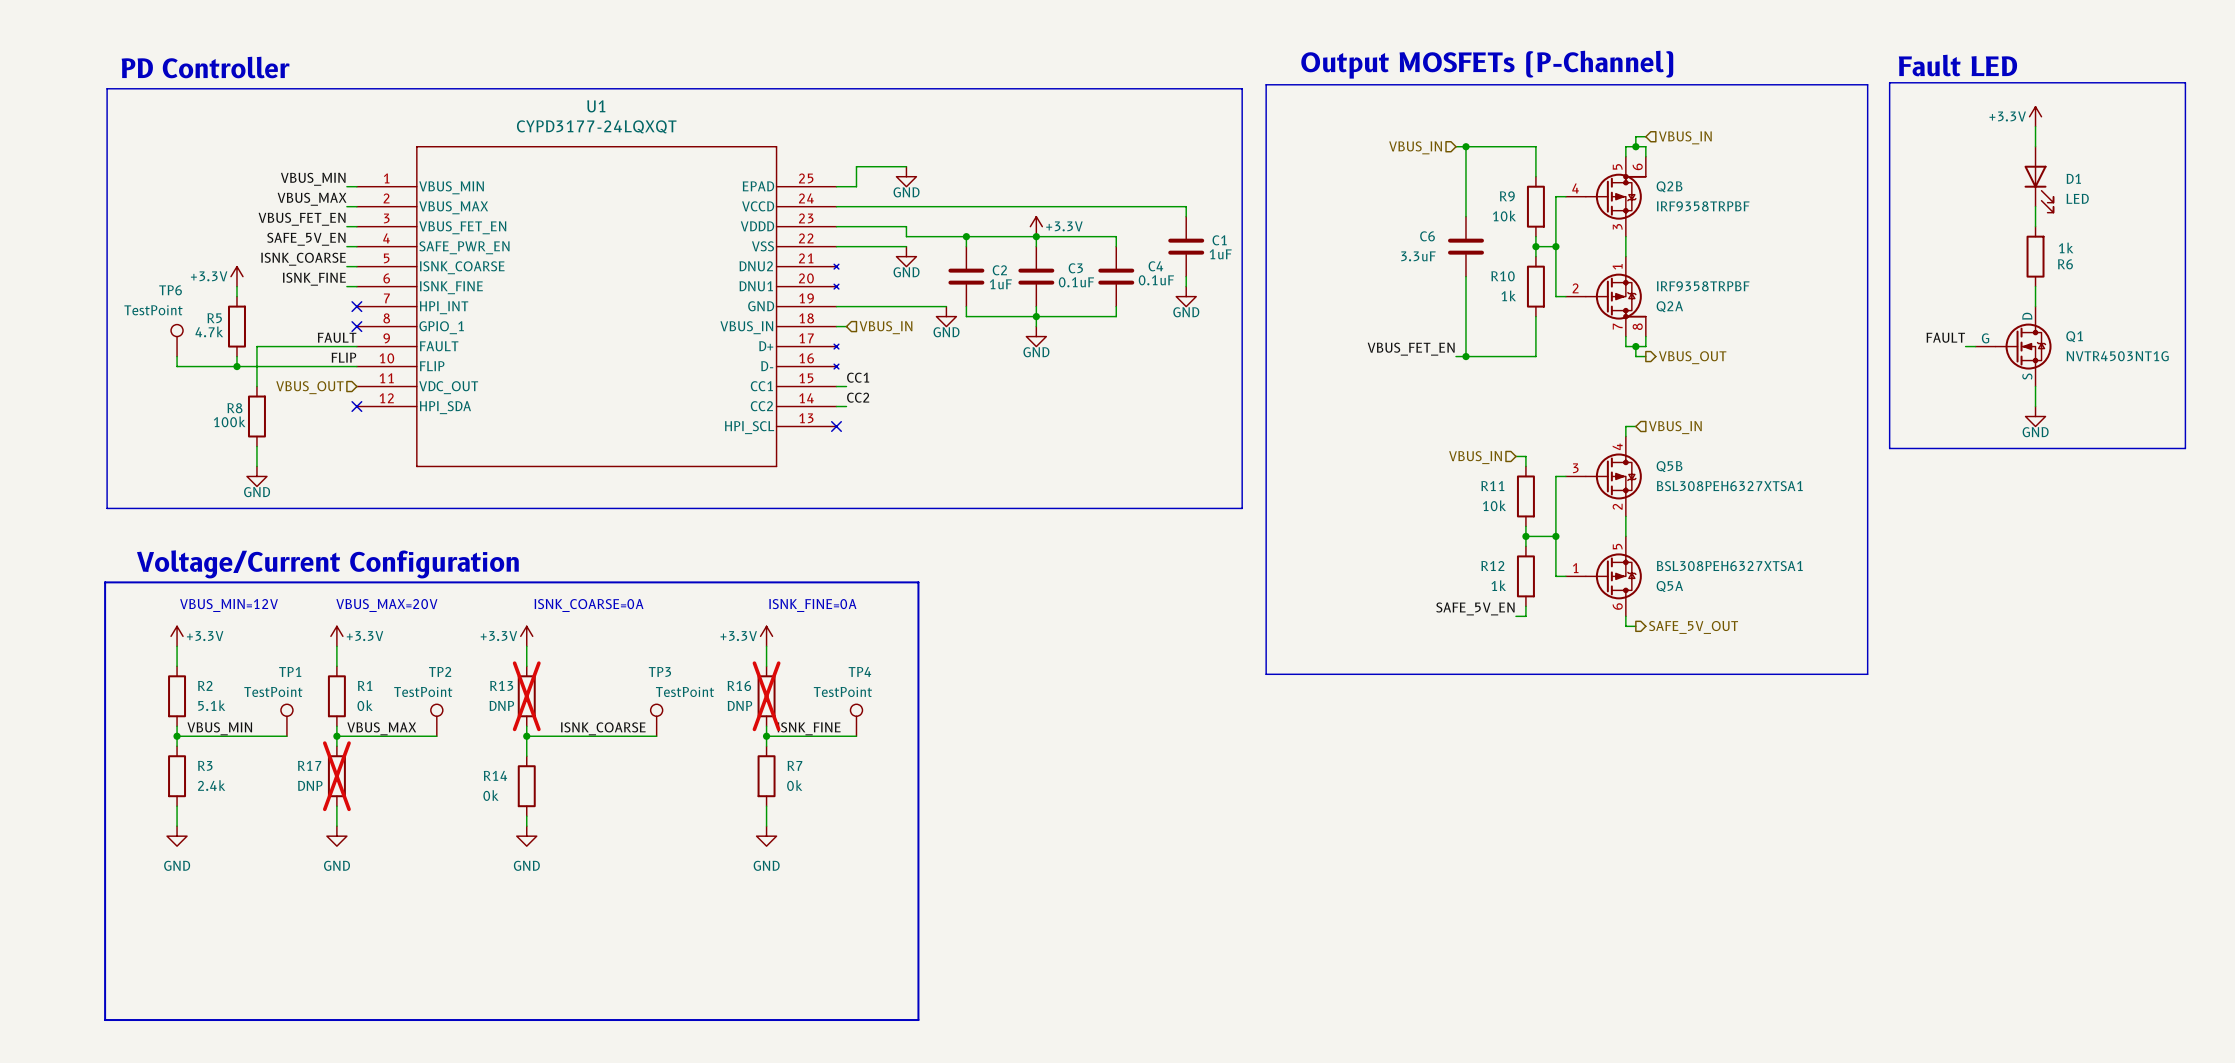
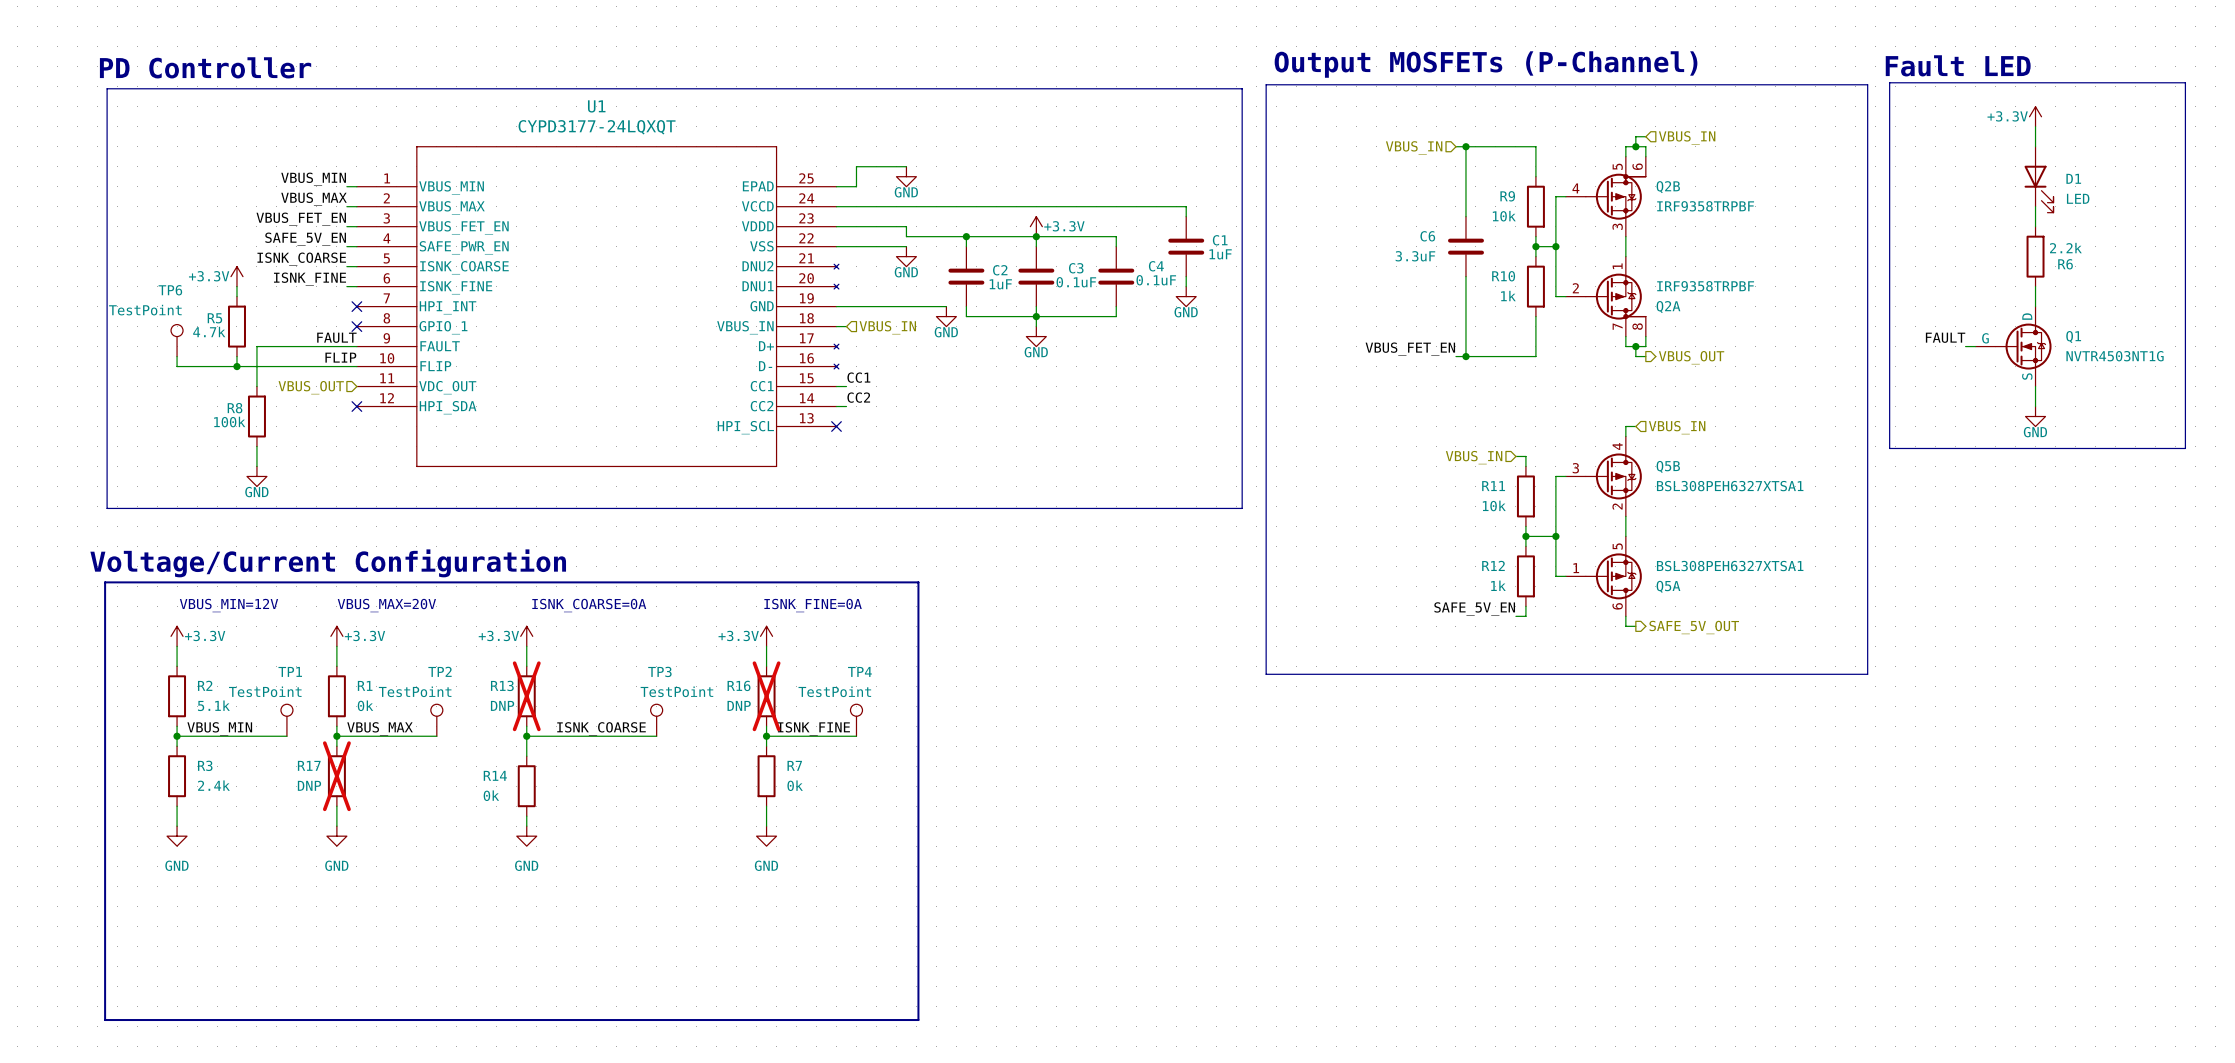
R6 value: 1k (2066, 247) -> 2.2k (2065, 248)

